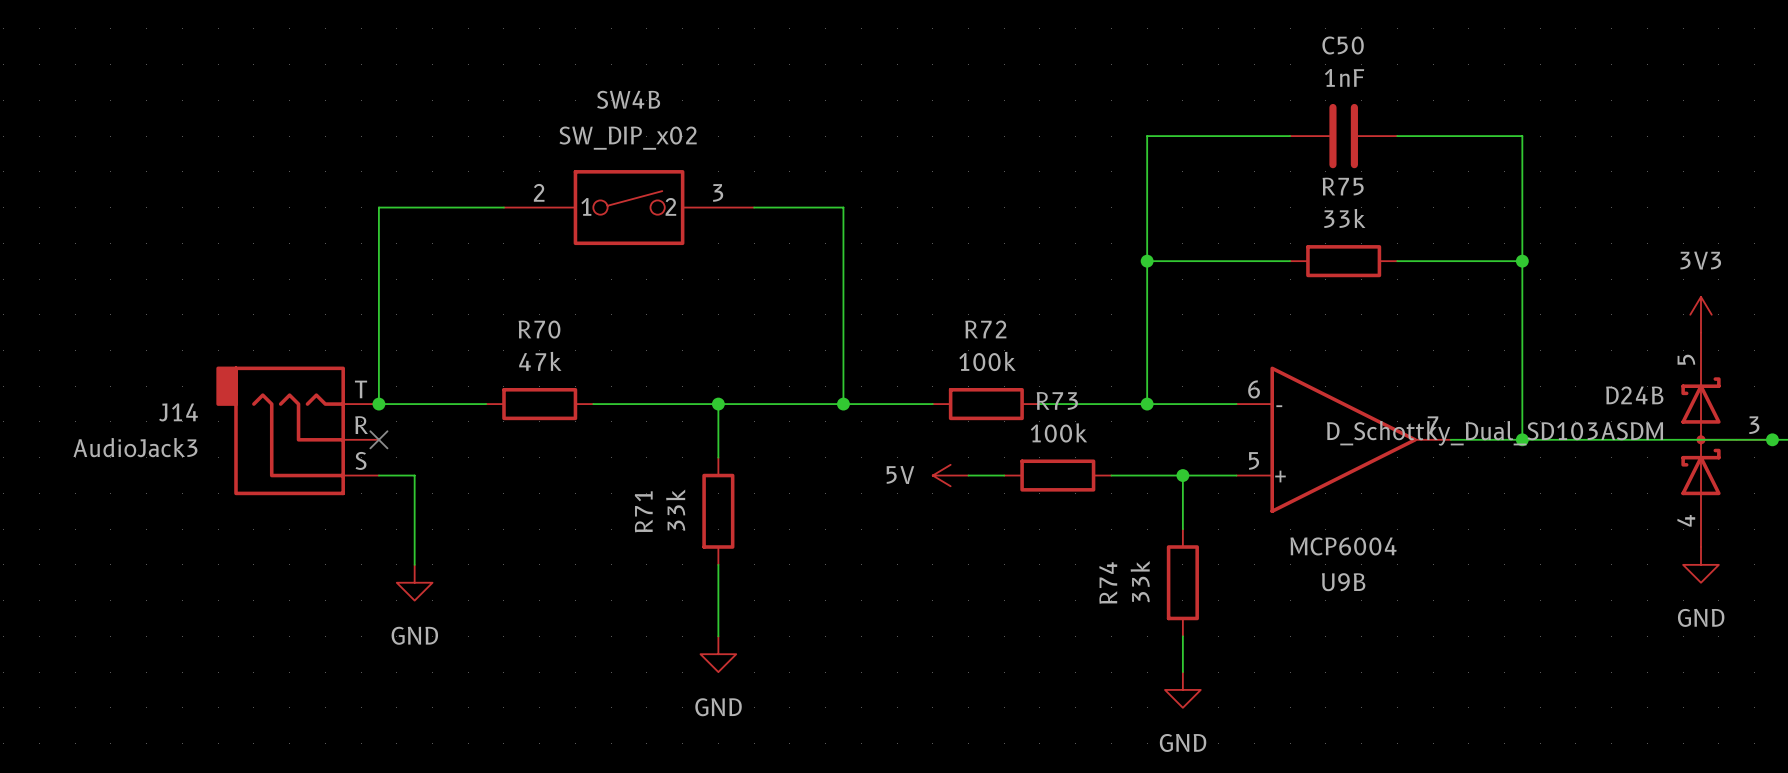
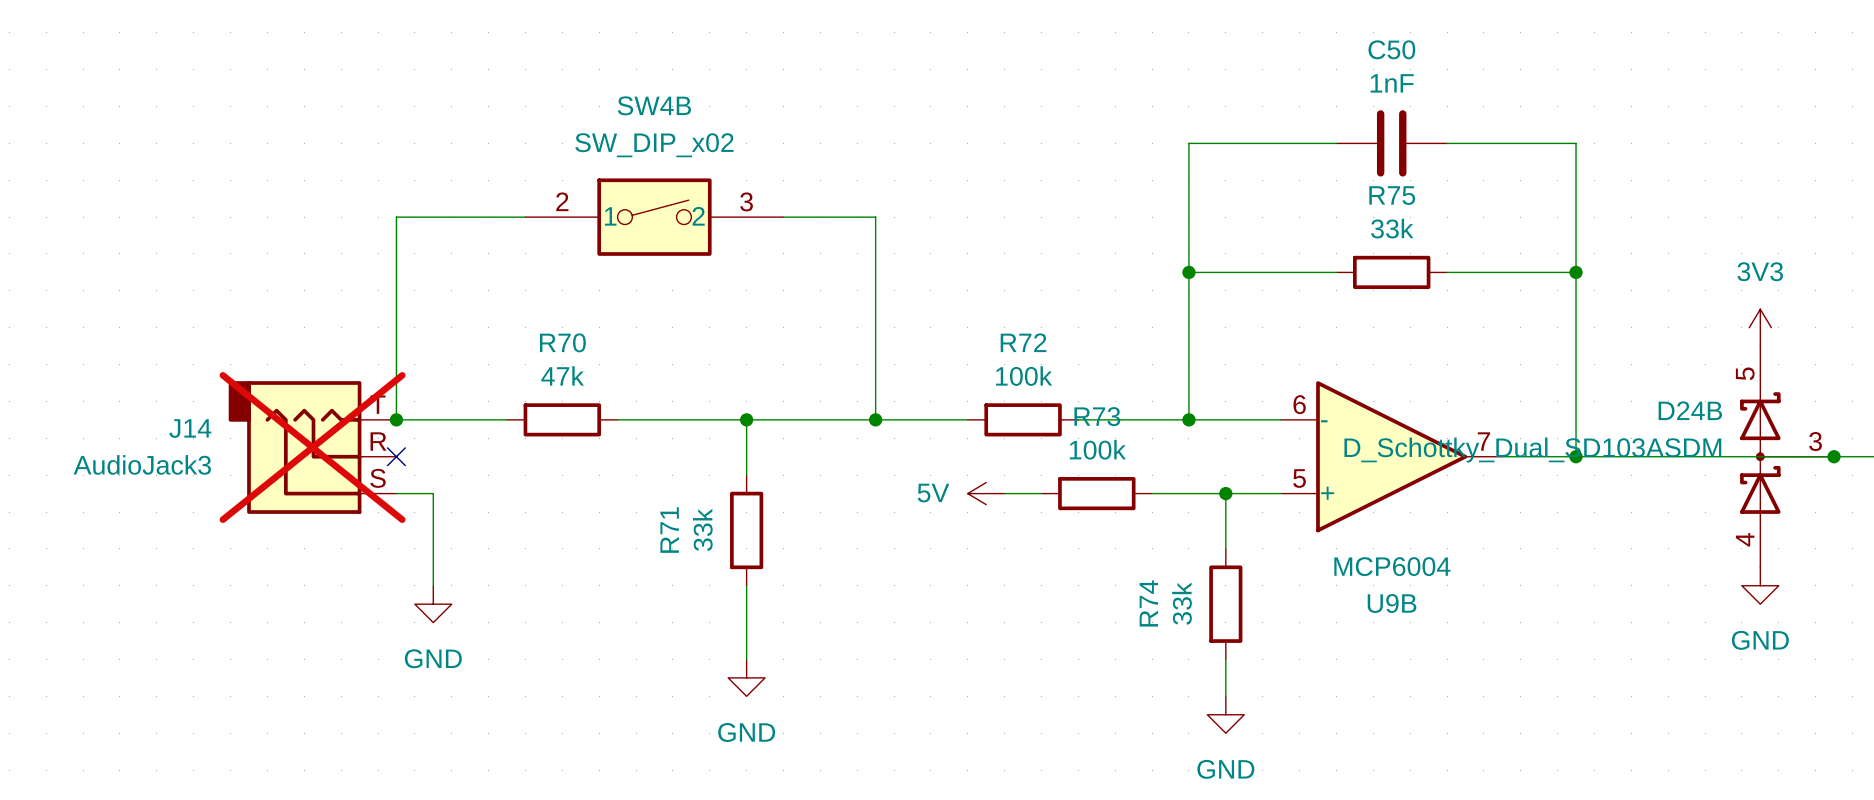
J14 do-not-place cross: none -> (312, 447)

